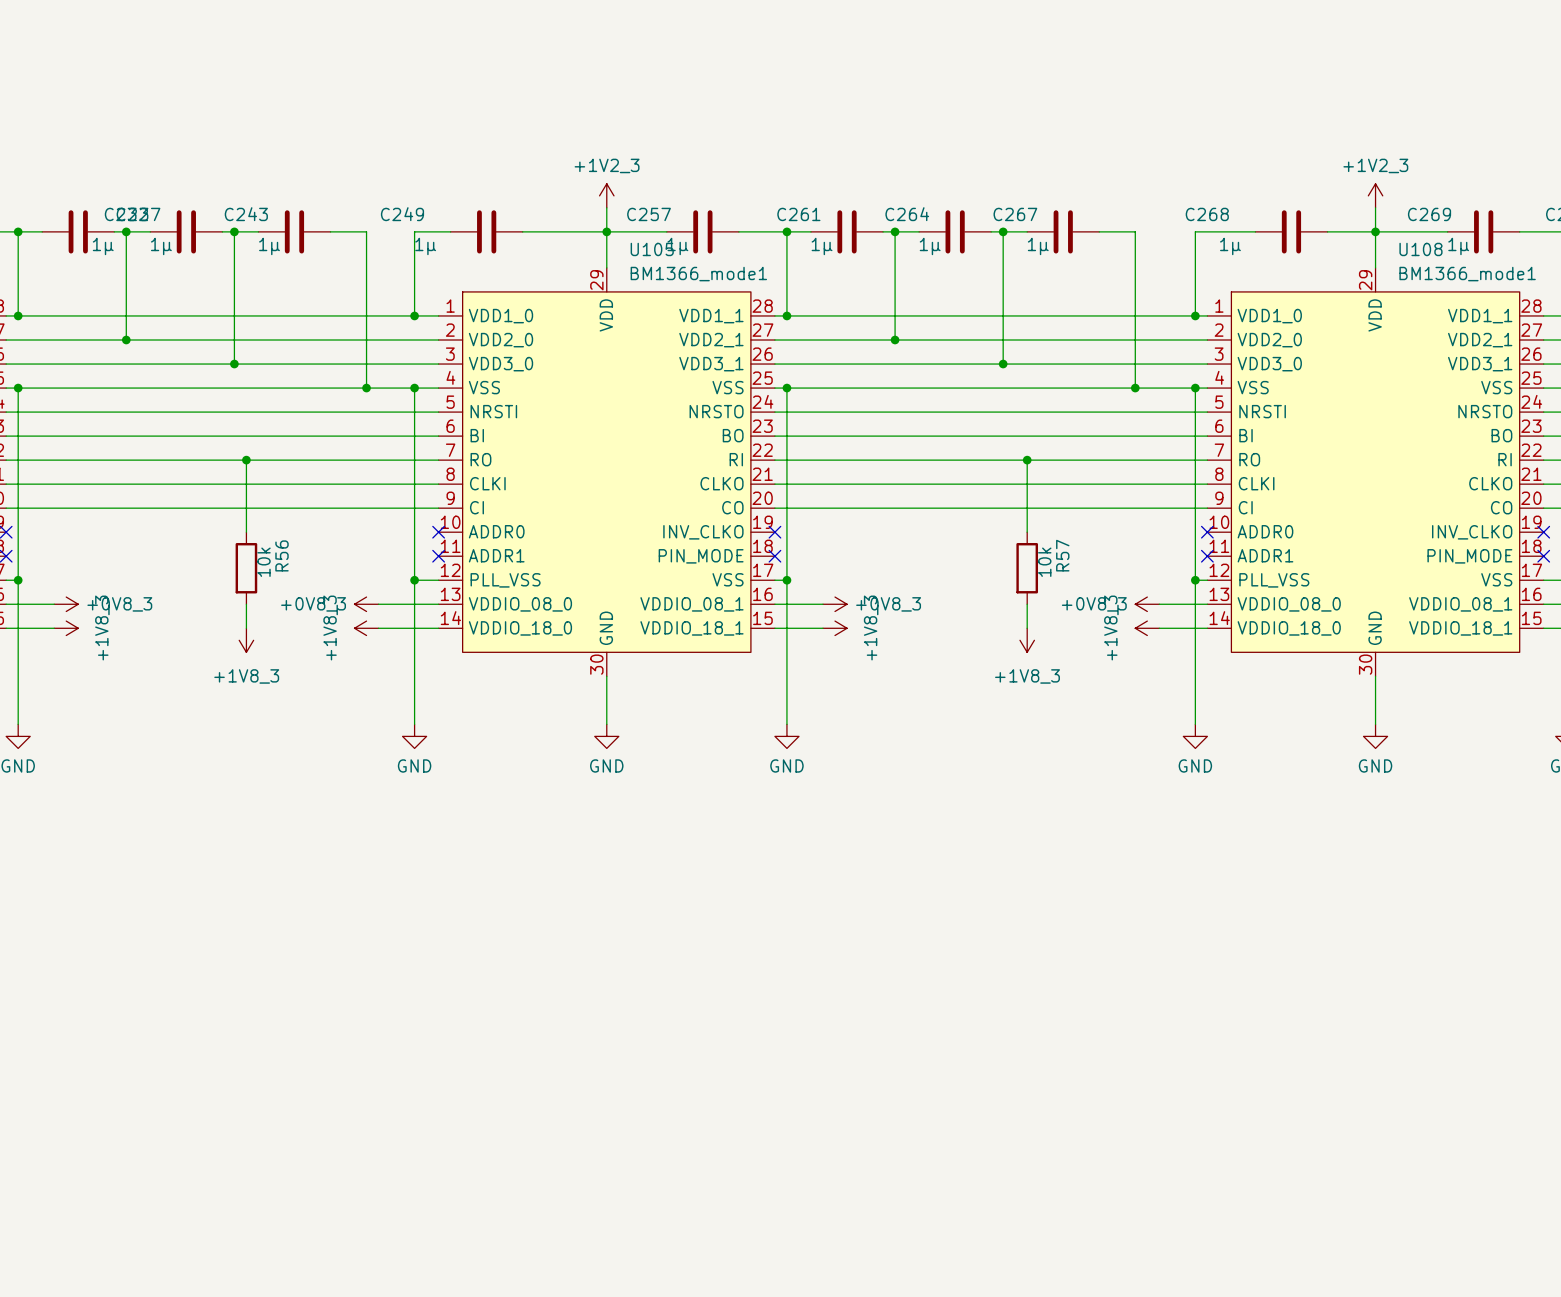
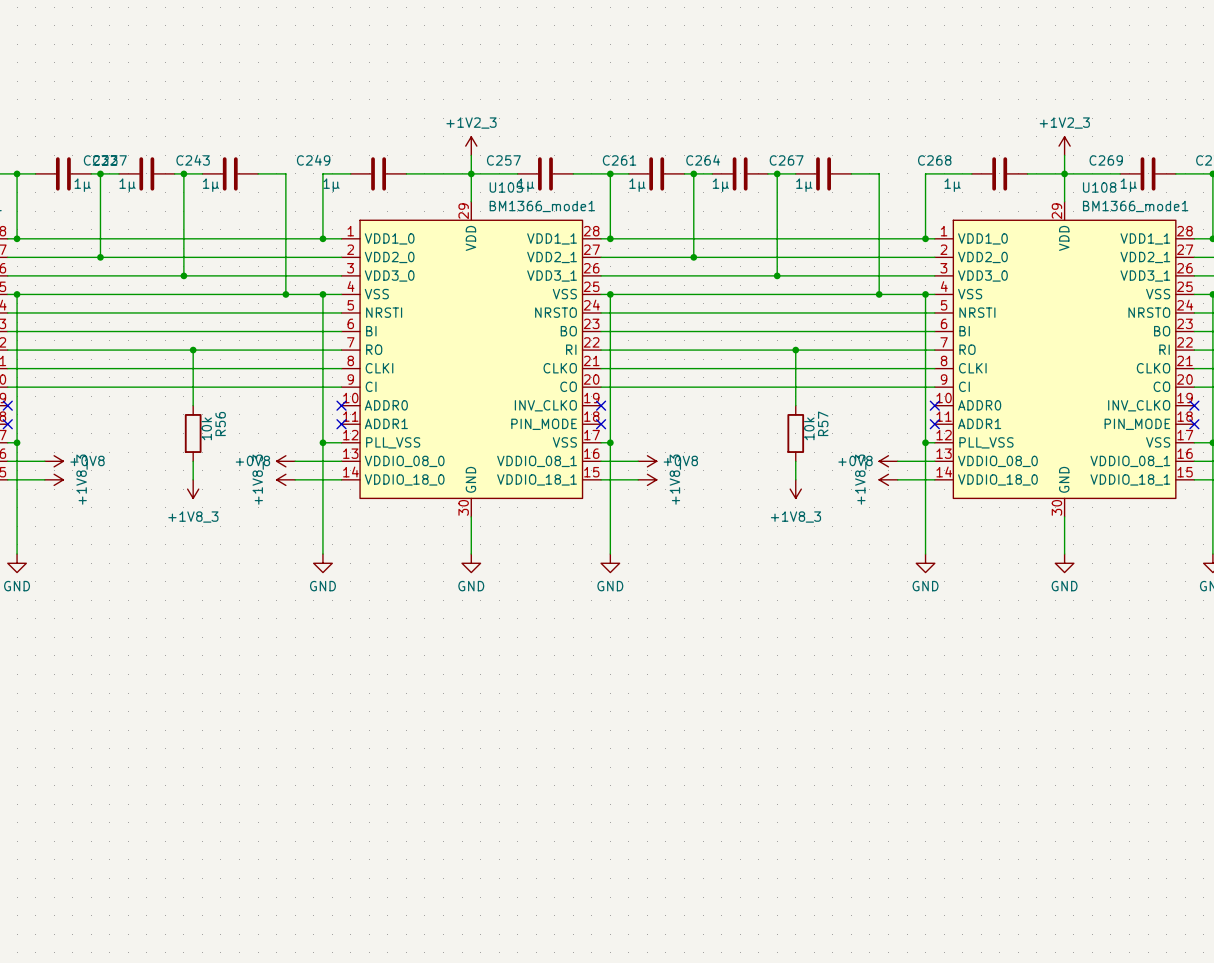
part value: +0V8_3 (119, 604) -> +0V8 (87, 460)
part value: +0V8_3 (313, 604) -> +0V8 (252, 460)
part value: +0V8_3 (888, 604) -> +0V8 (680, 460)
part value: +0V8_3 (1094, 604) -> +0V8 (855, 460)

